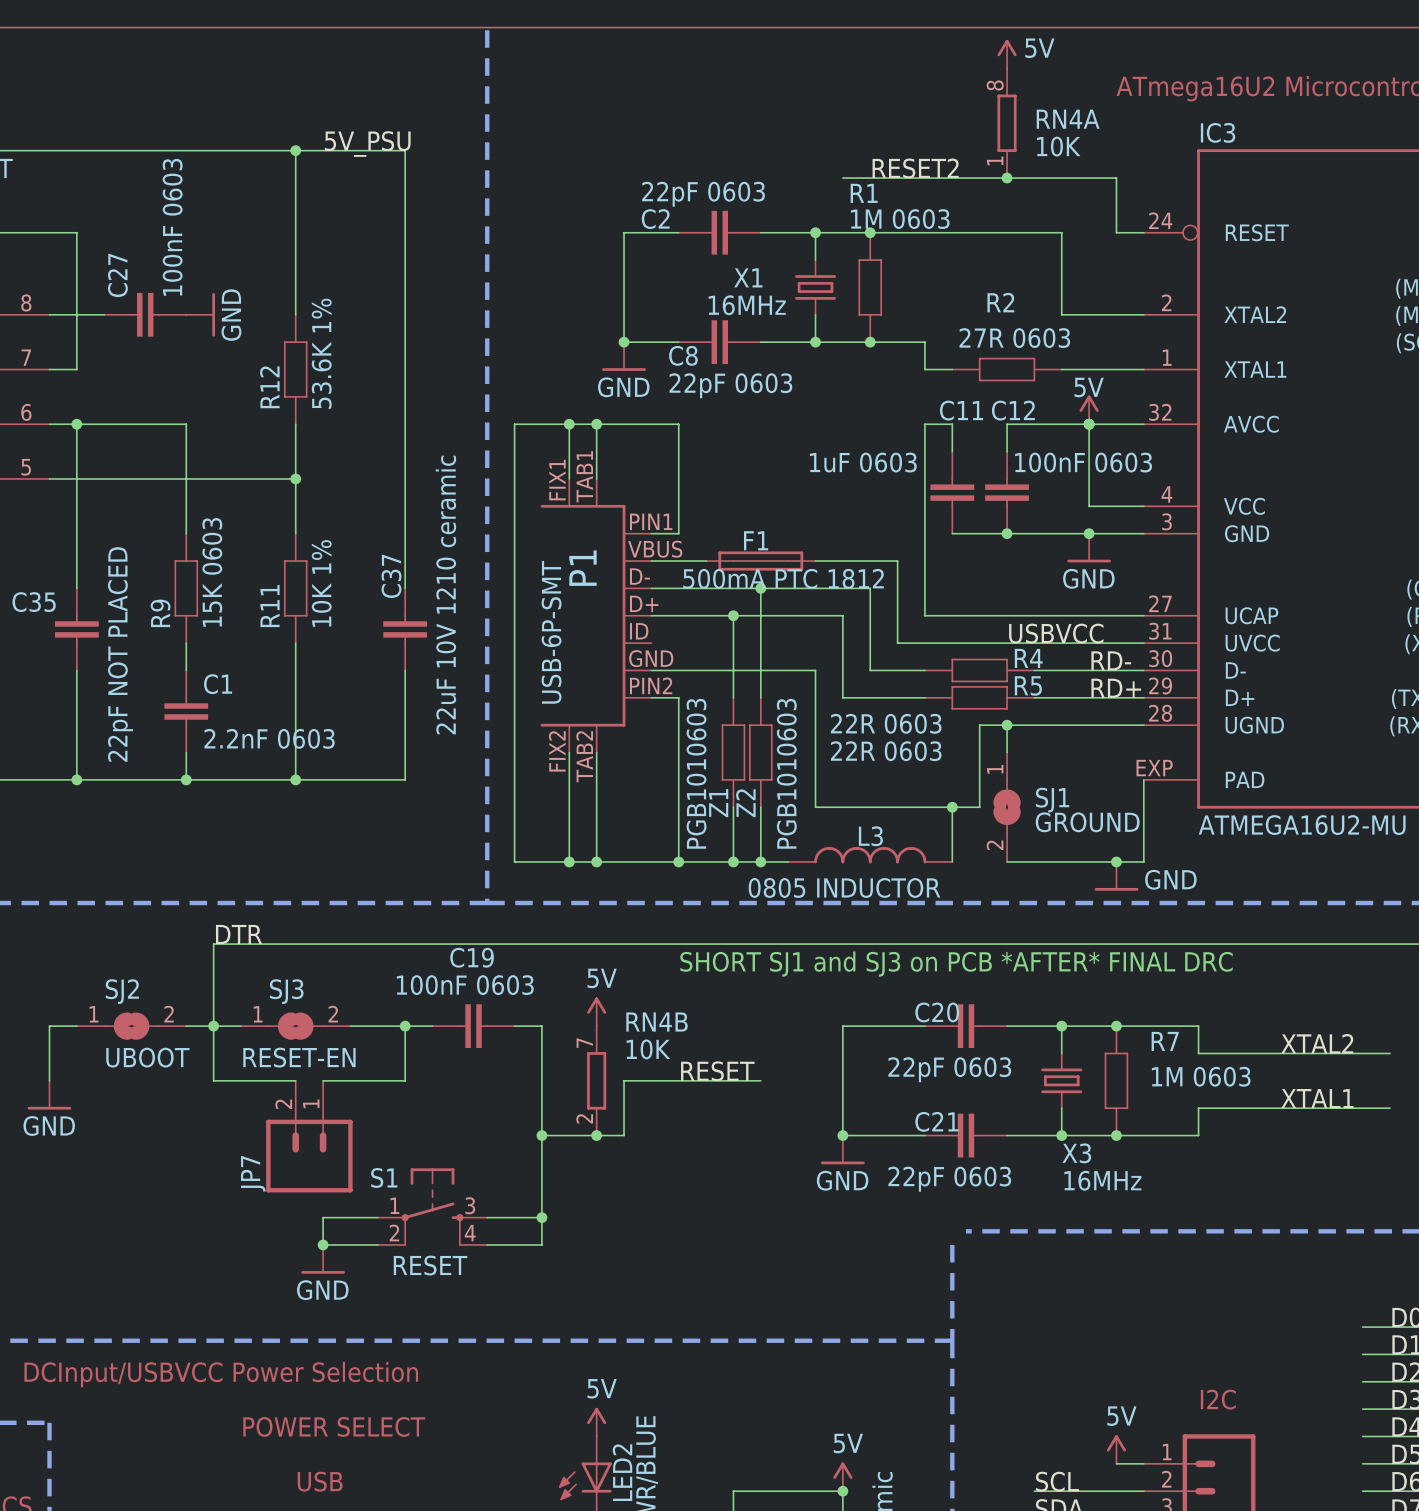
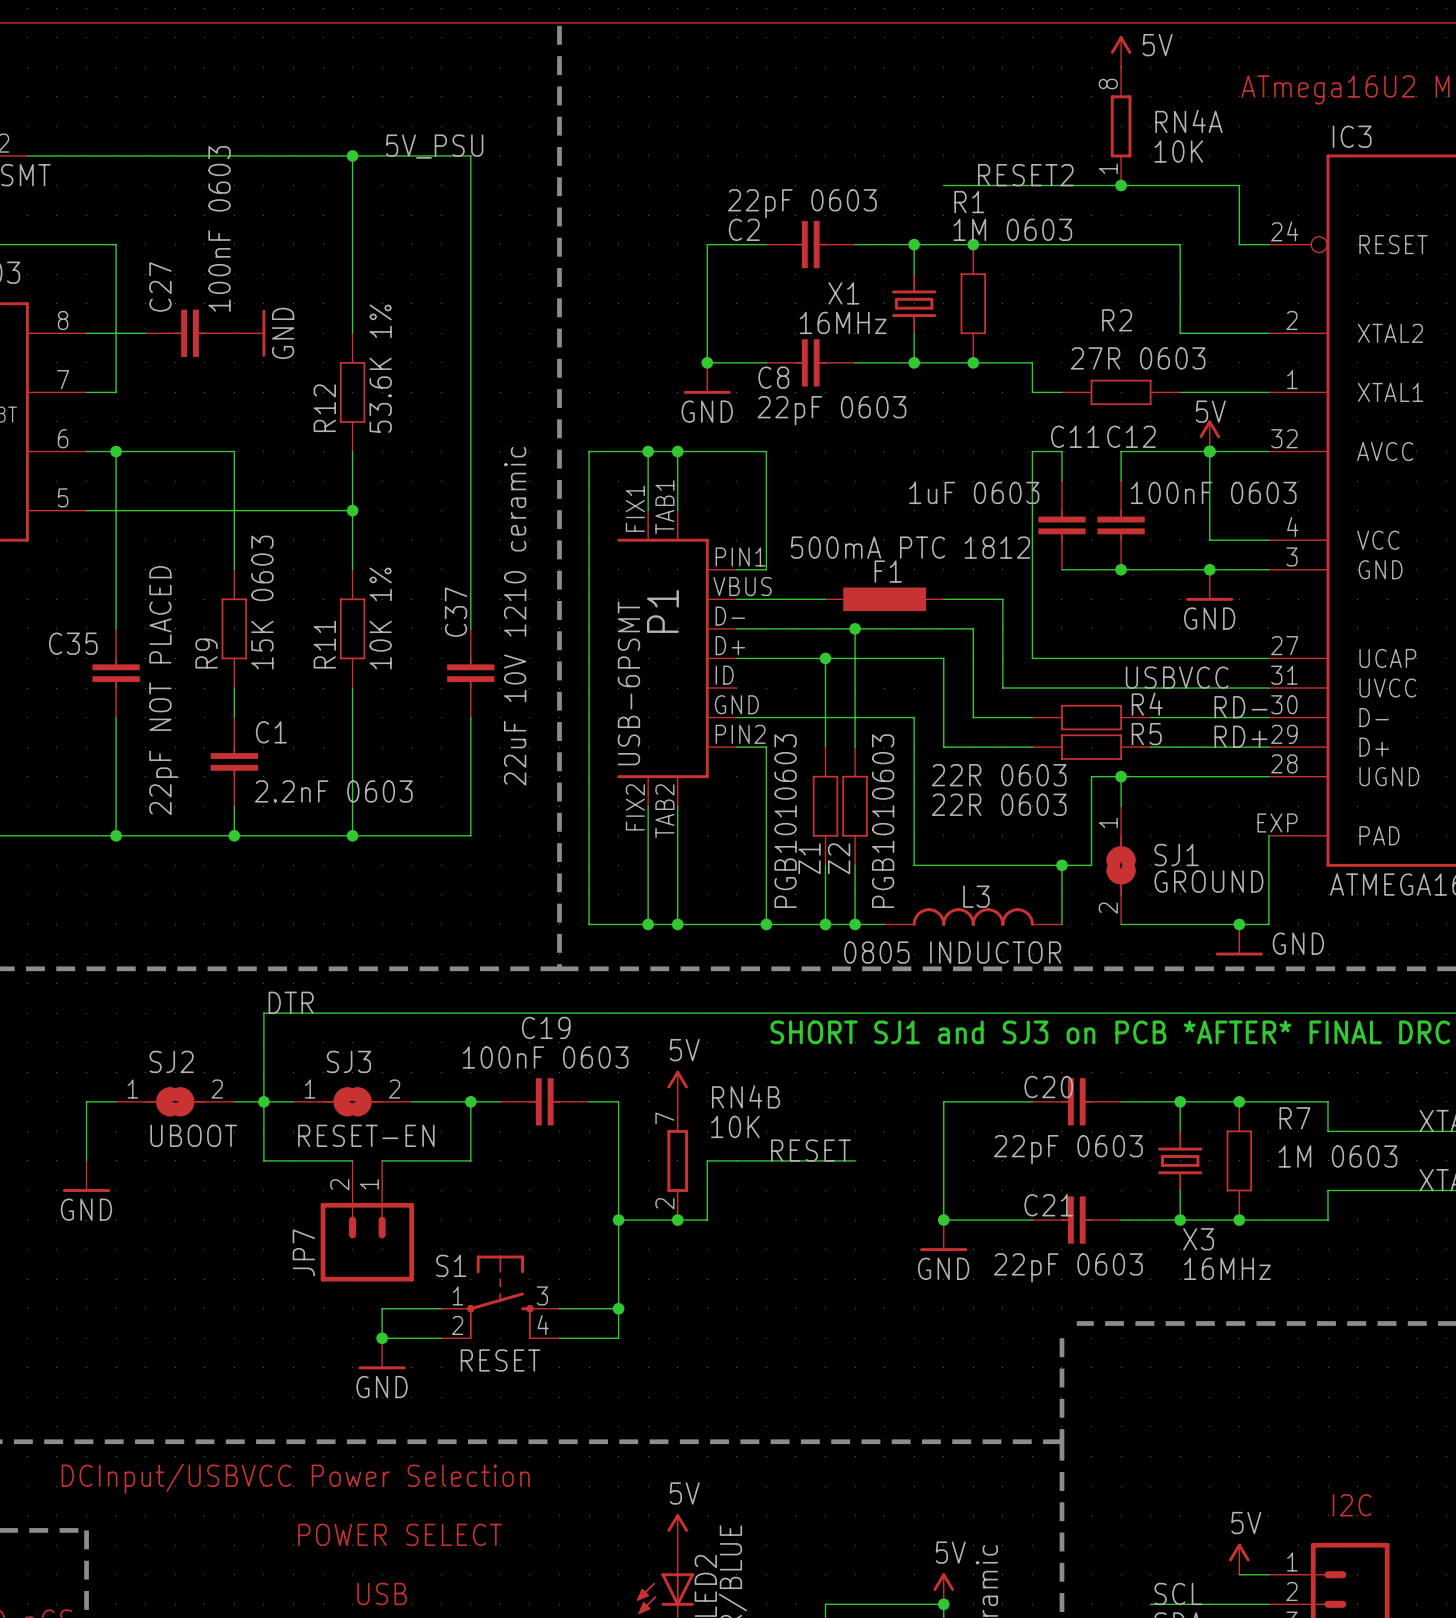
F1 symbol: [706, 551, 816, 571] -> [825, 587, 944, 612]
F1 value position: 500mA PTC 1812 (783, 578) -> 500mA PTC 1812 (910, 547)
P1 value: USB-6P-SMT (551, 632) -> USB-6PSMT (628, 683)

